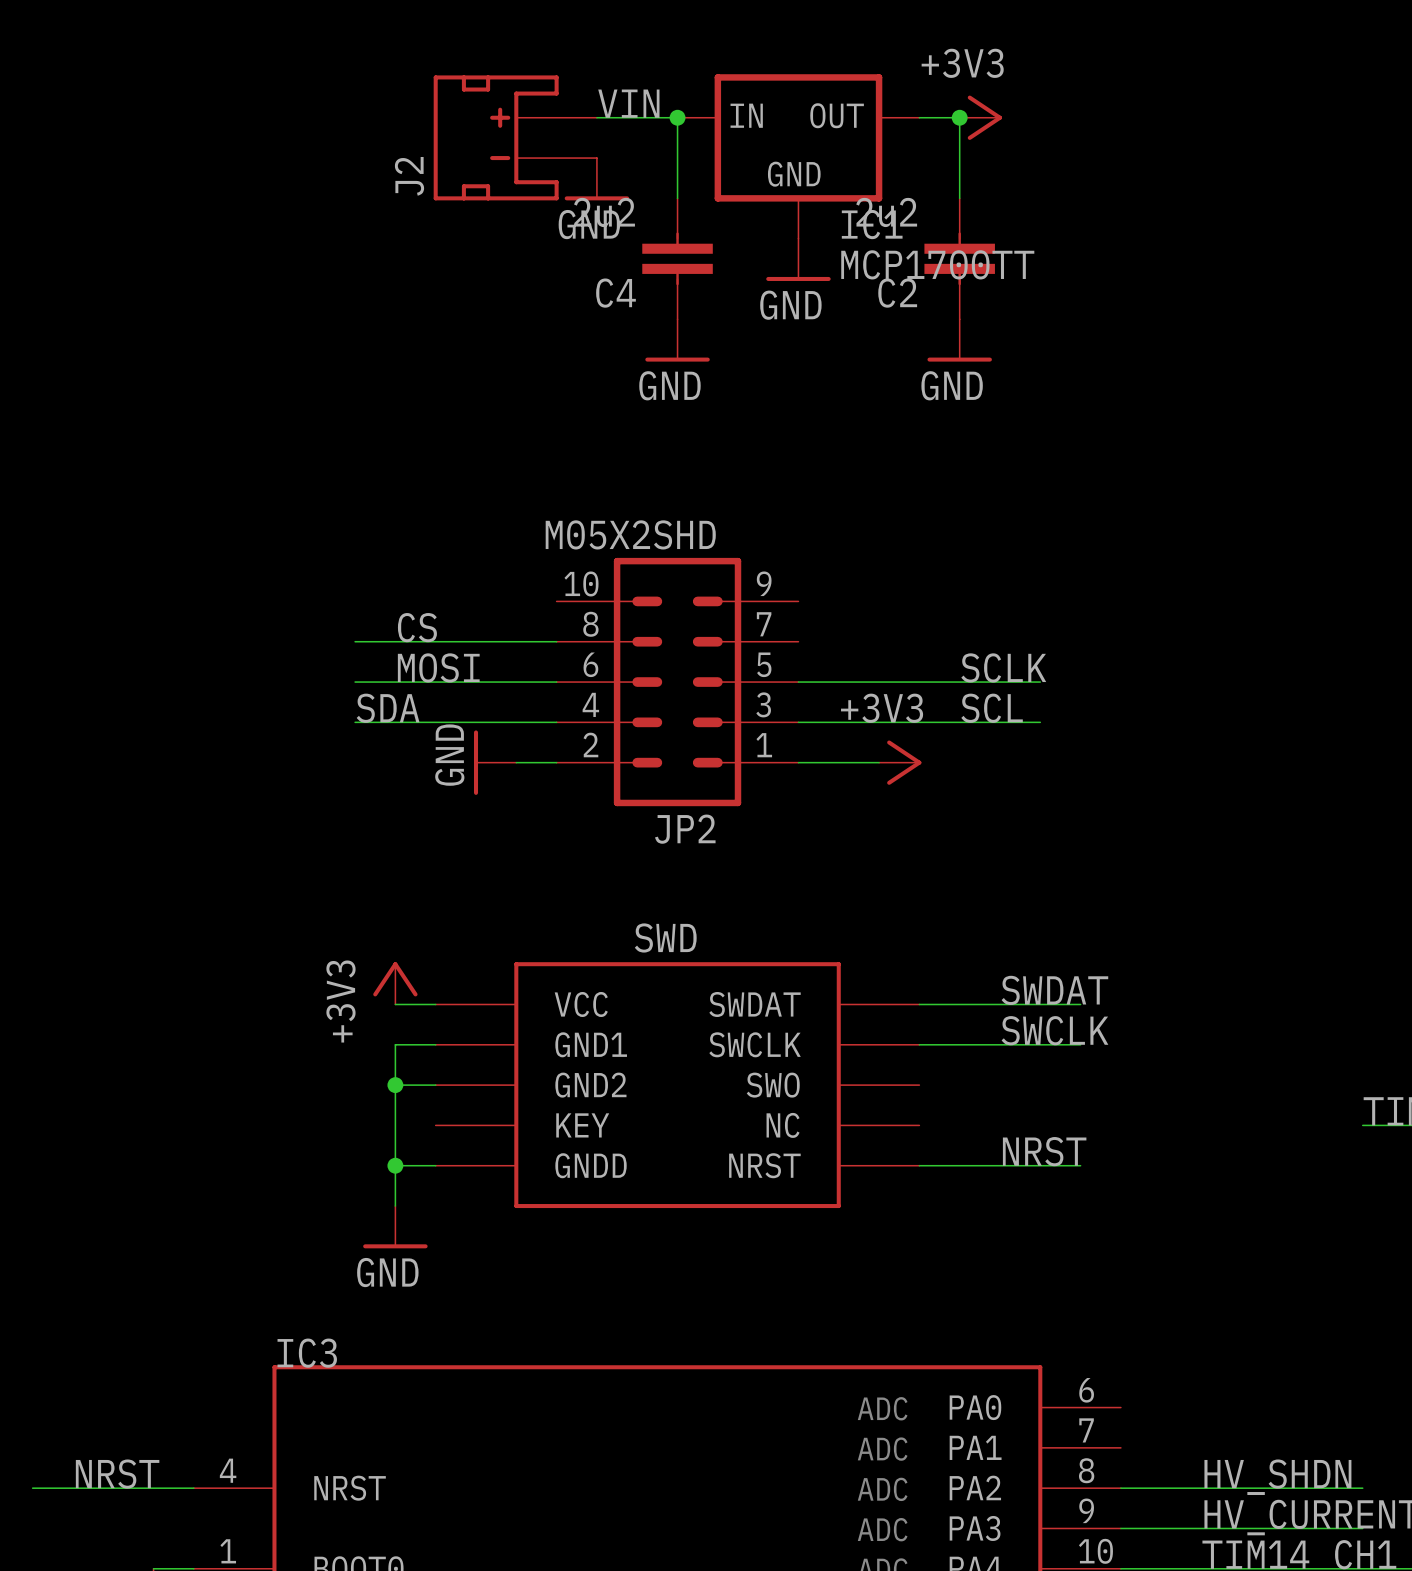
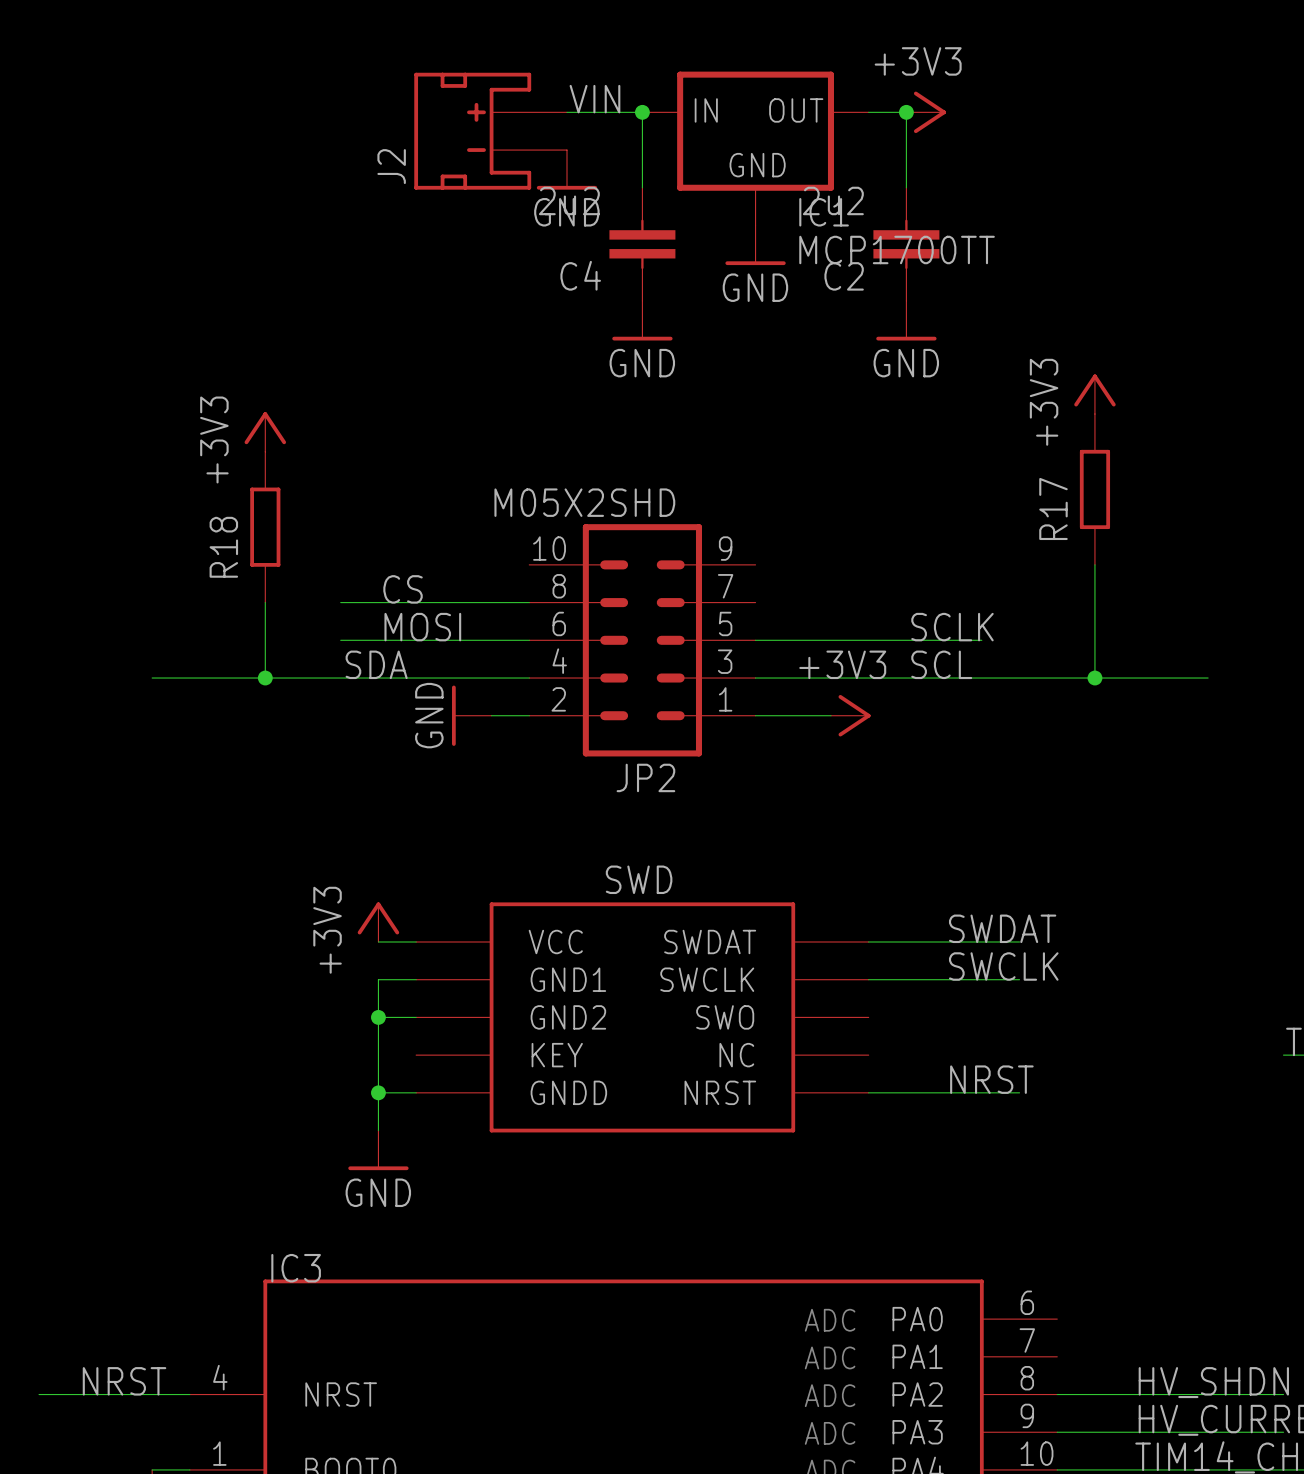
power symbol: none -> +3V3 (1094, 394)
power symbol: none -> +3V3 (265, 431)
R17: none -> (1094, 489)
R18: none -> (265, 527)
wire: none -> (1094, 564) (1094, 678)
wire: none -> (265, 602) (265, 678)
wire: none -> (152, 678) (340, 678)
junction: none -> (265, 678)
wire: none -> (981, 678) (1208, 678)
junction: none -> (1094, 678)

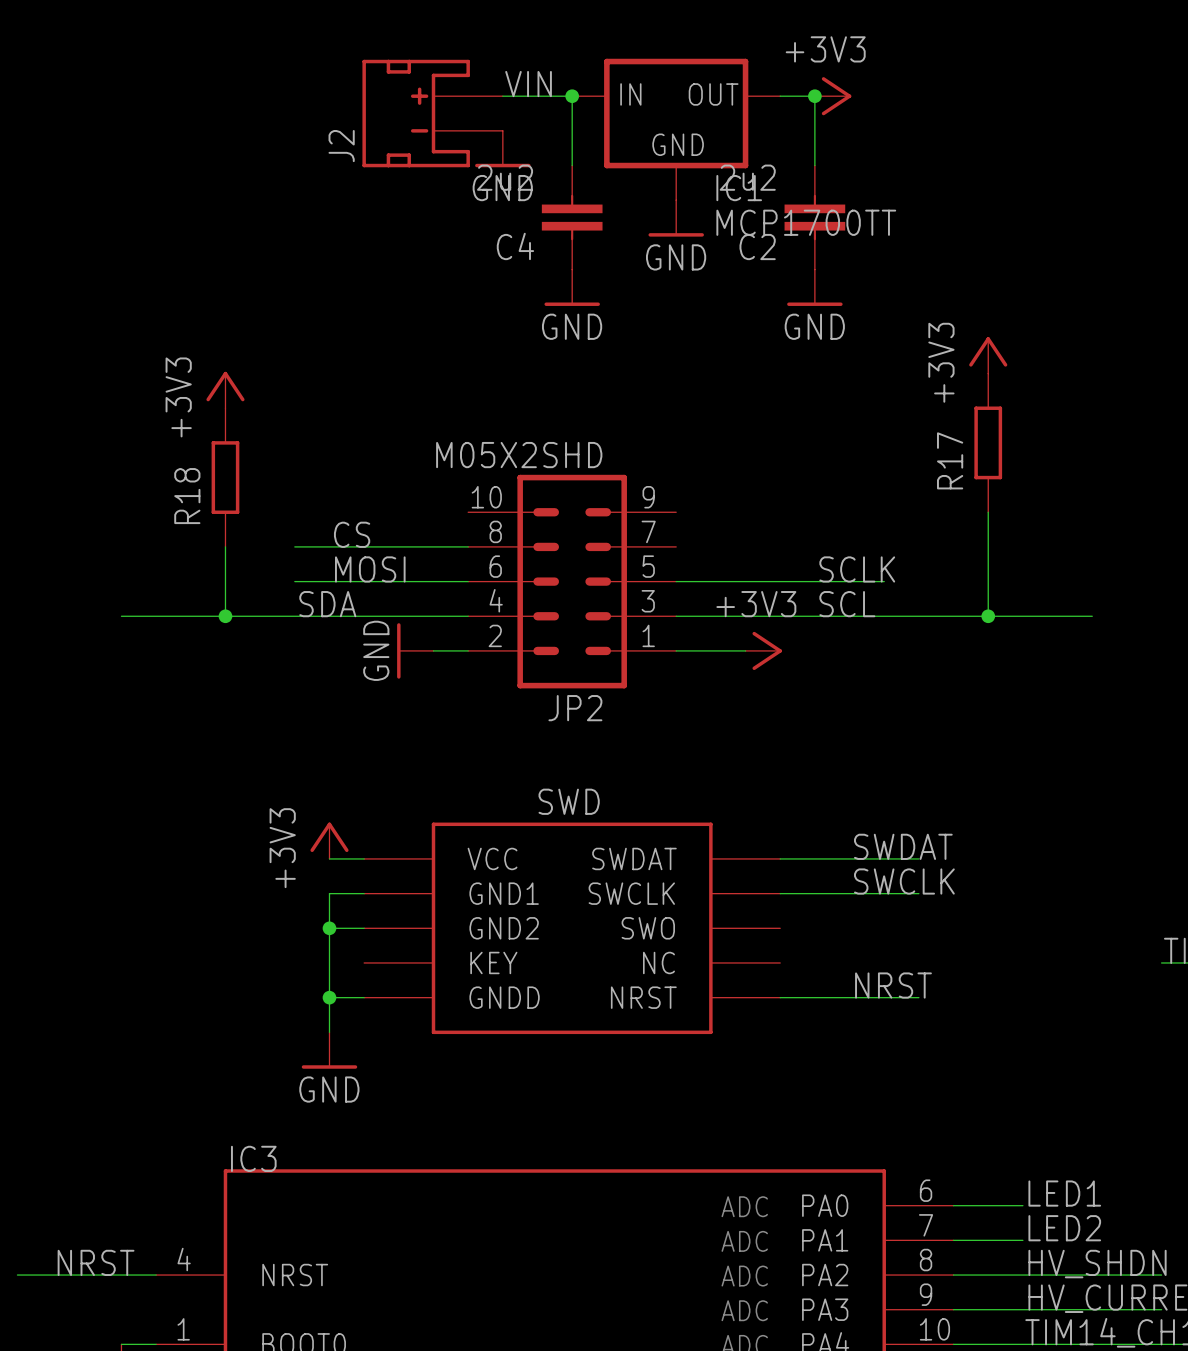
label: none -> LED1 (1064, 1193)
wire: none -> (953, 1205) (1022, 1205)
label: none -> LED2 (1064, 1228)
wire: none -> (953, 1240) (1022, 1240)

